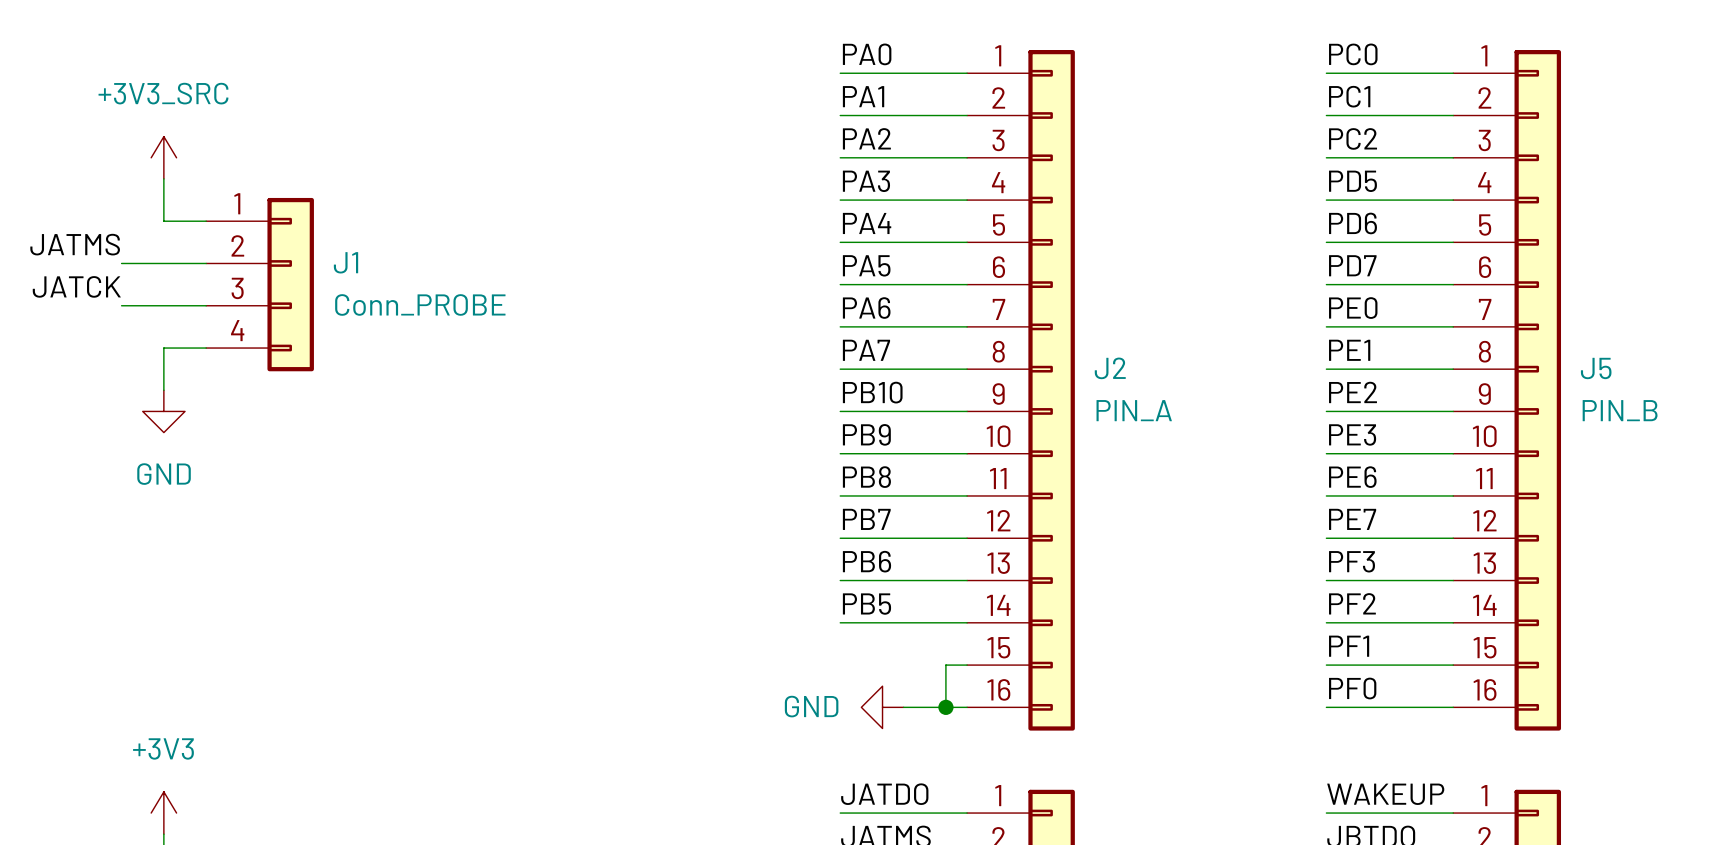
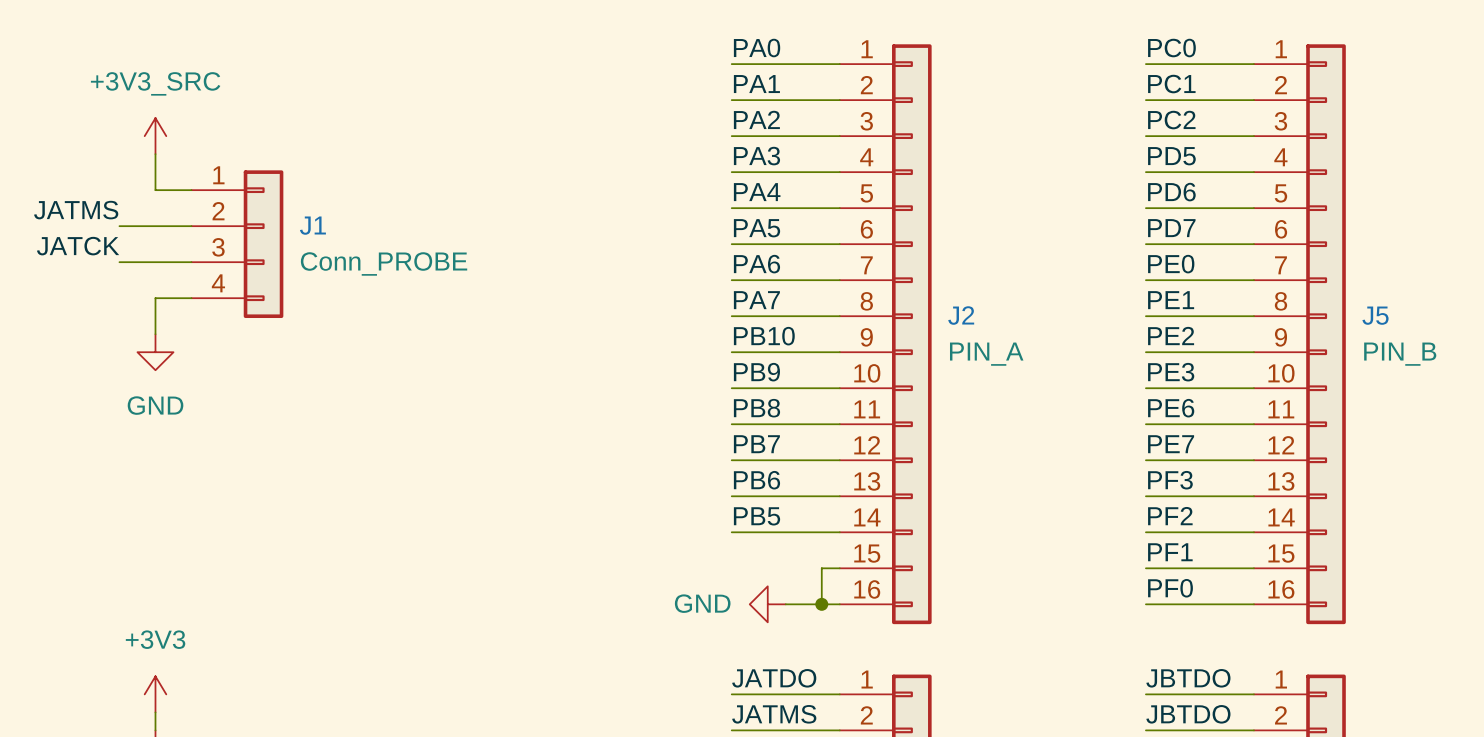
label: WAKEUP (1385, 794) -> JBTDO (1188, 678)

